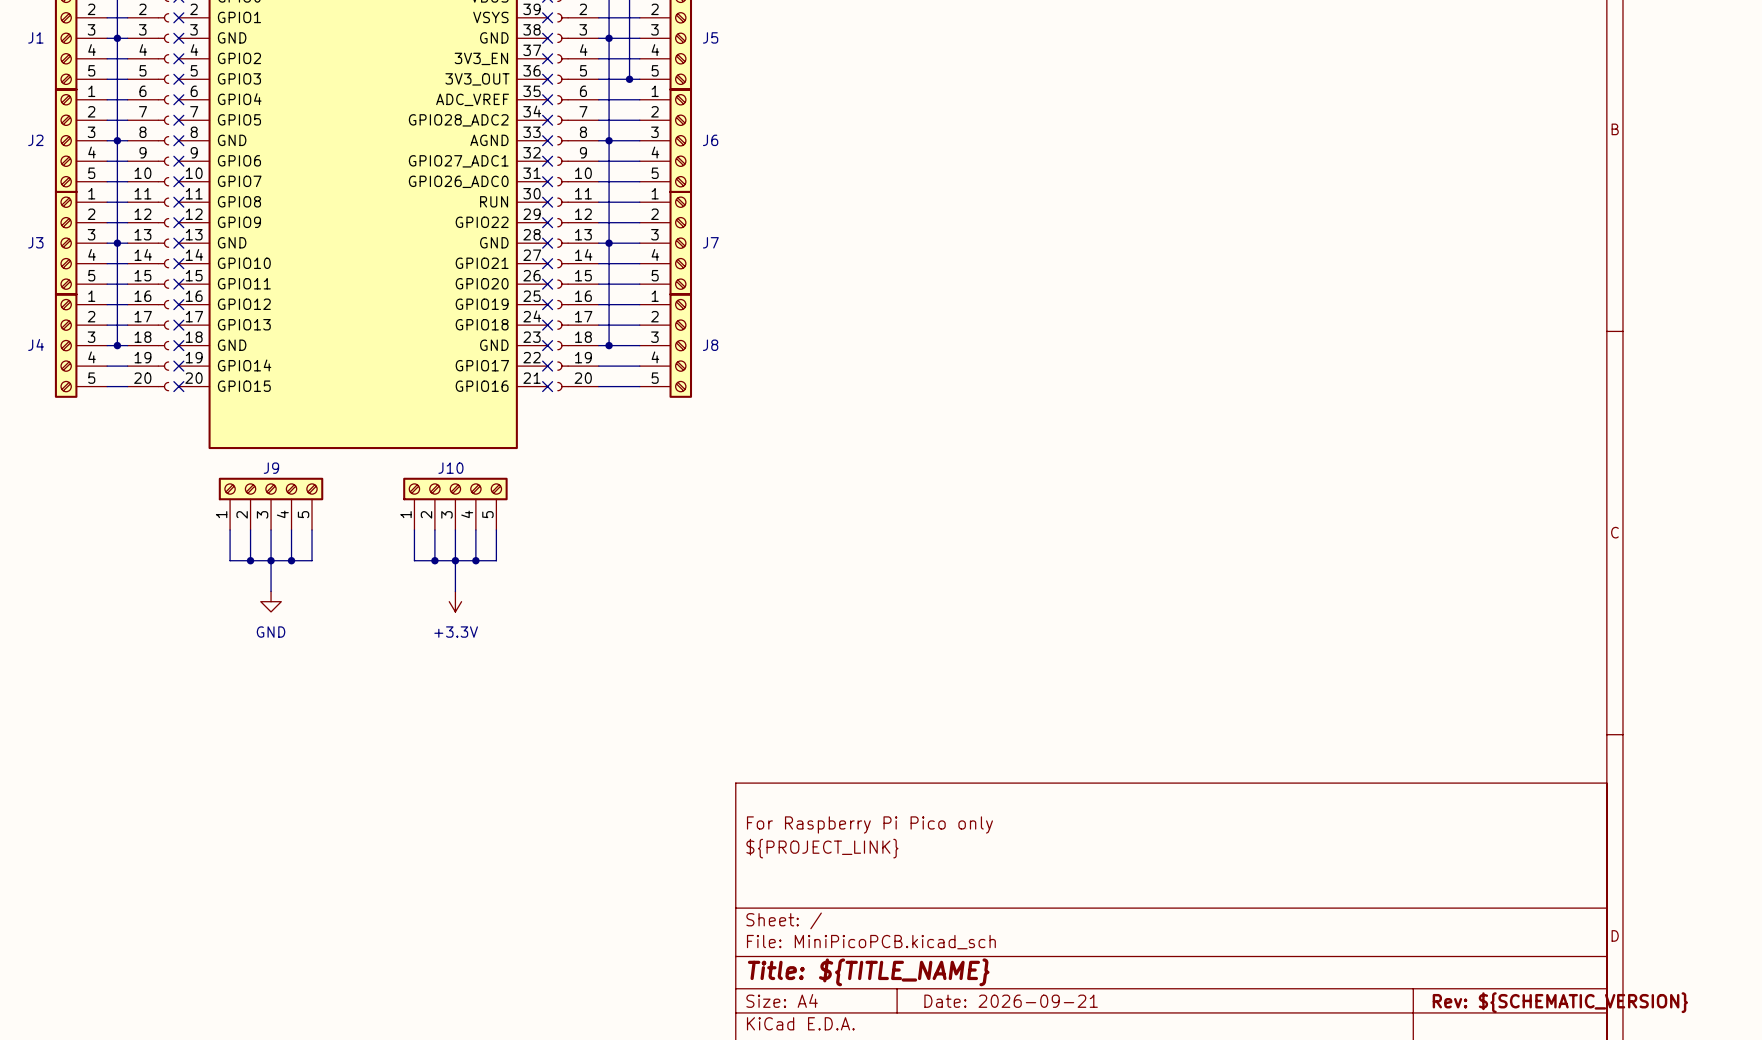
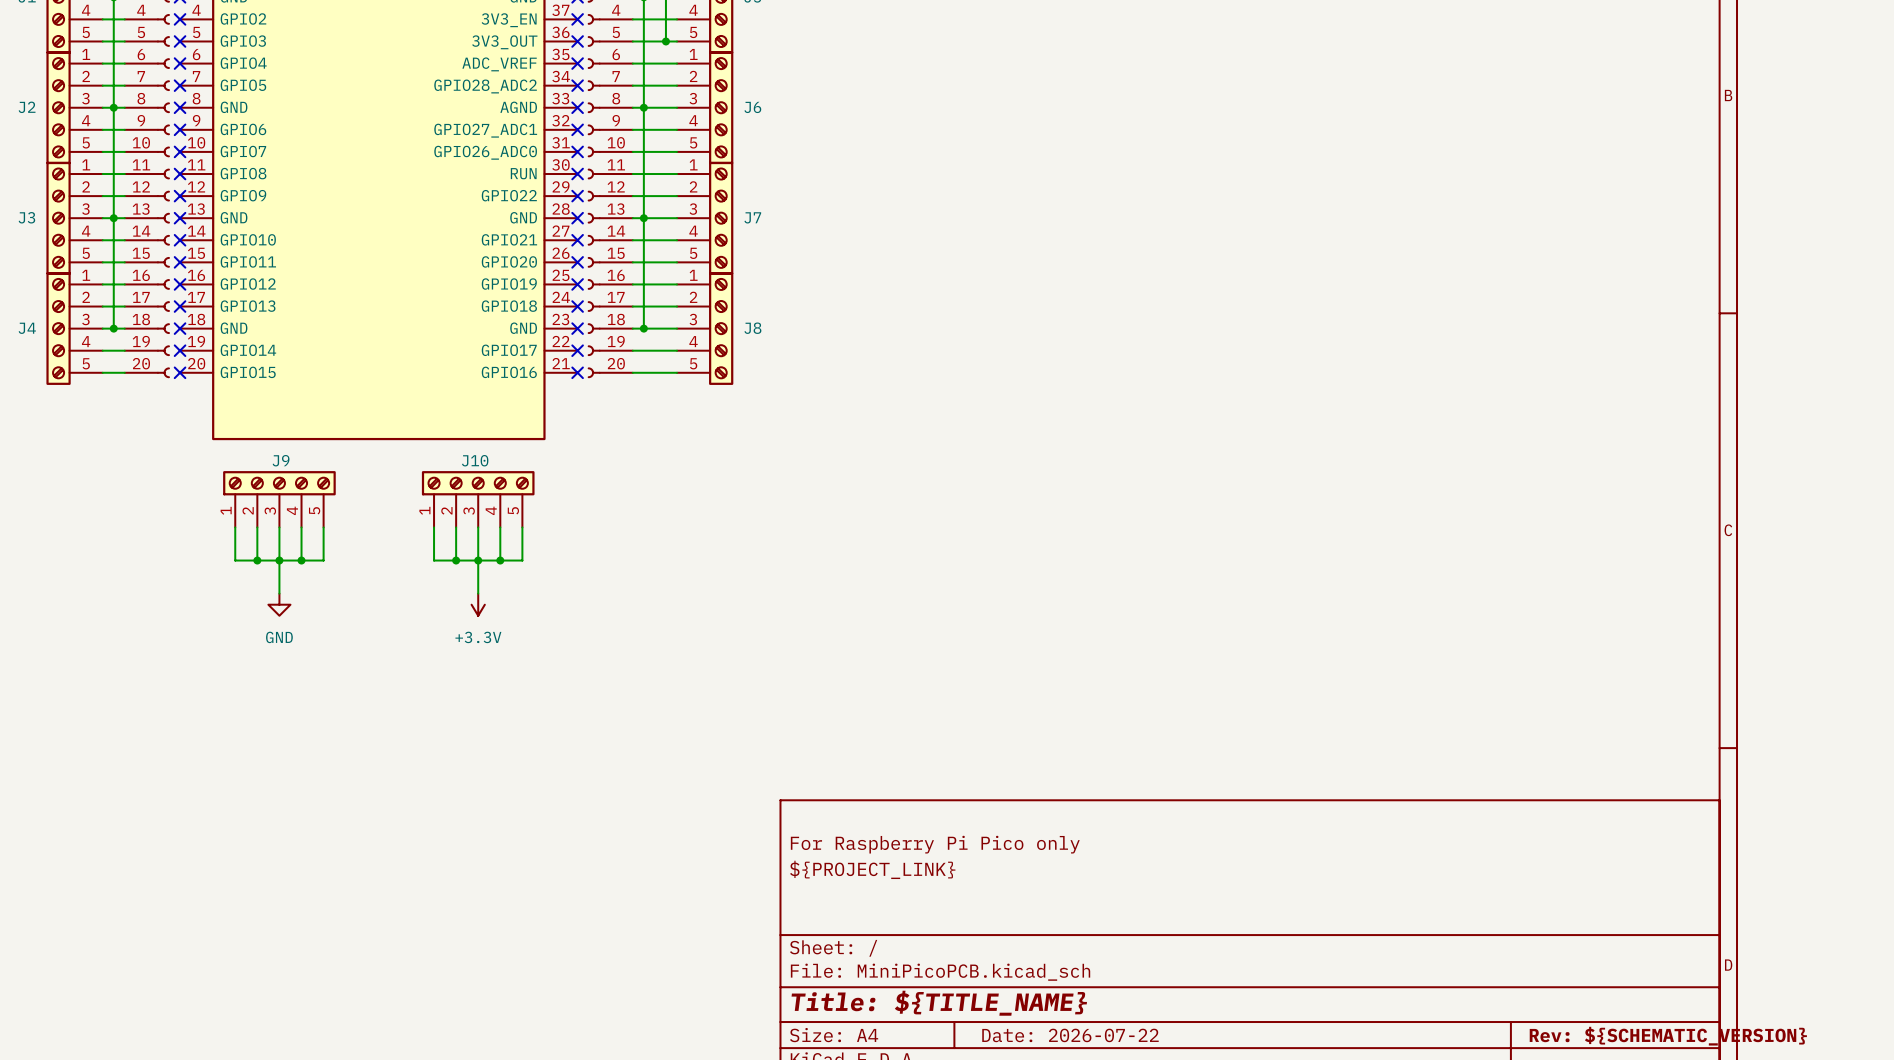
title block: Date: 2026-09-21 (1011, 1001) -> Date: 2026-07-22 (1070, 1035)

